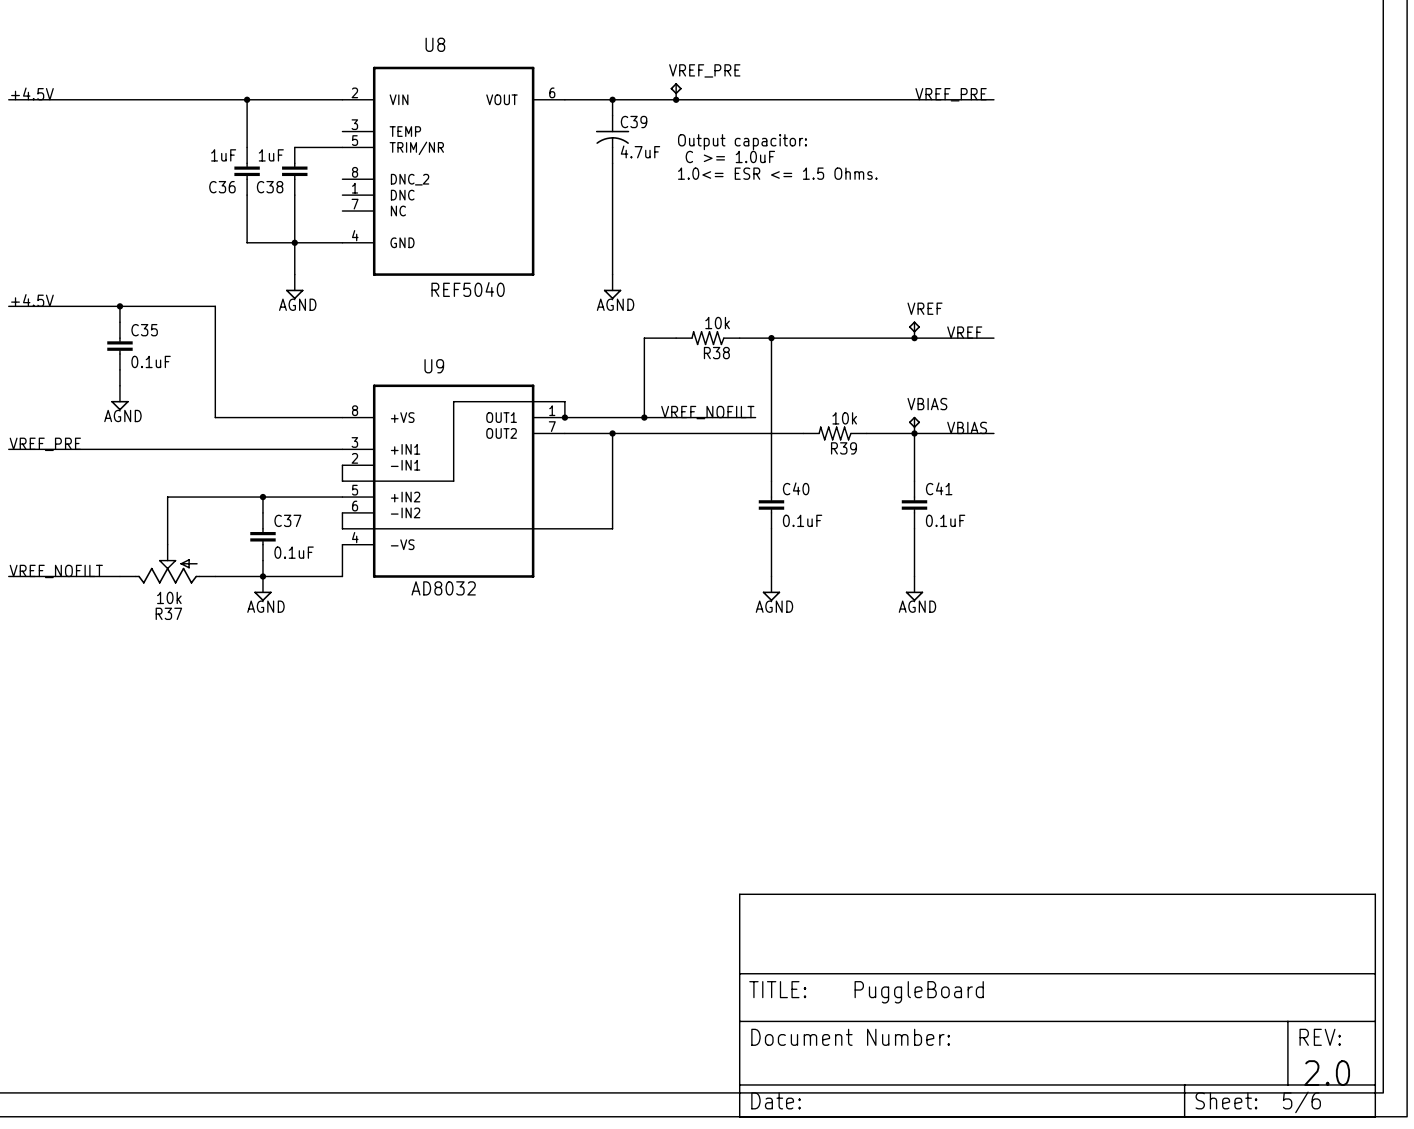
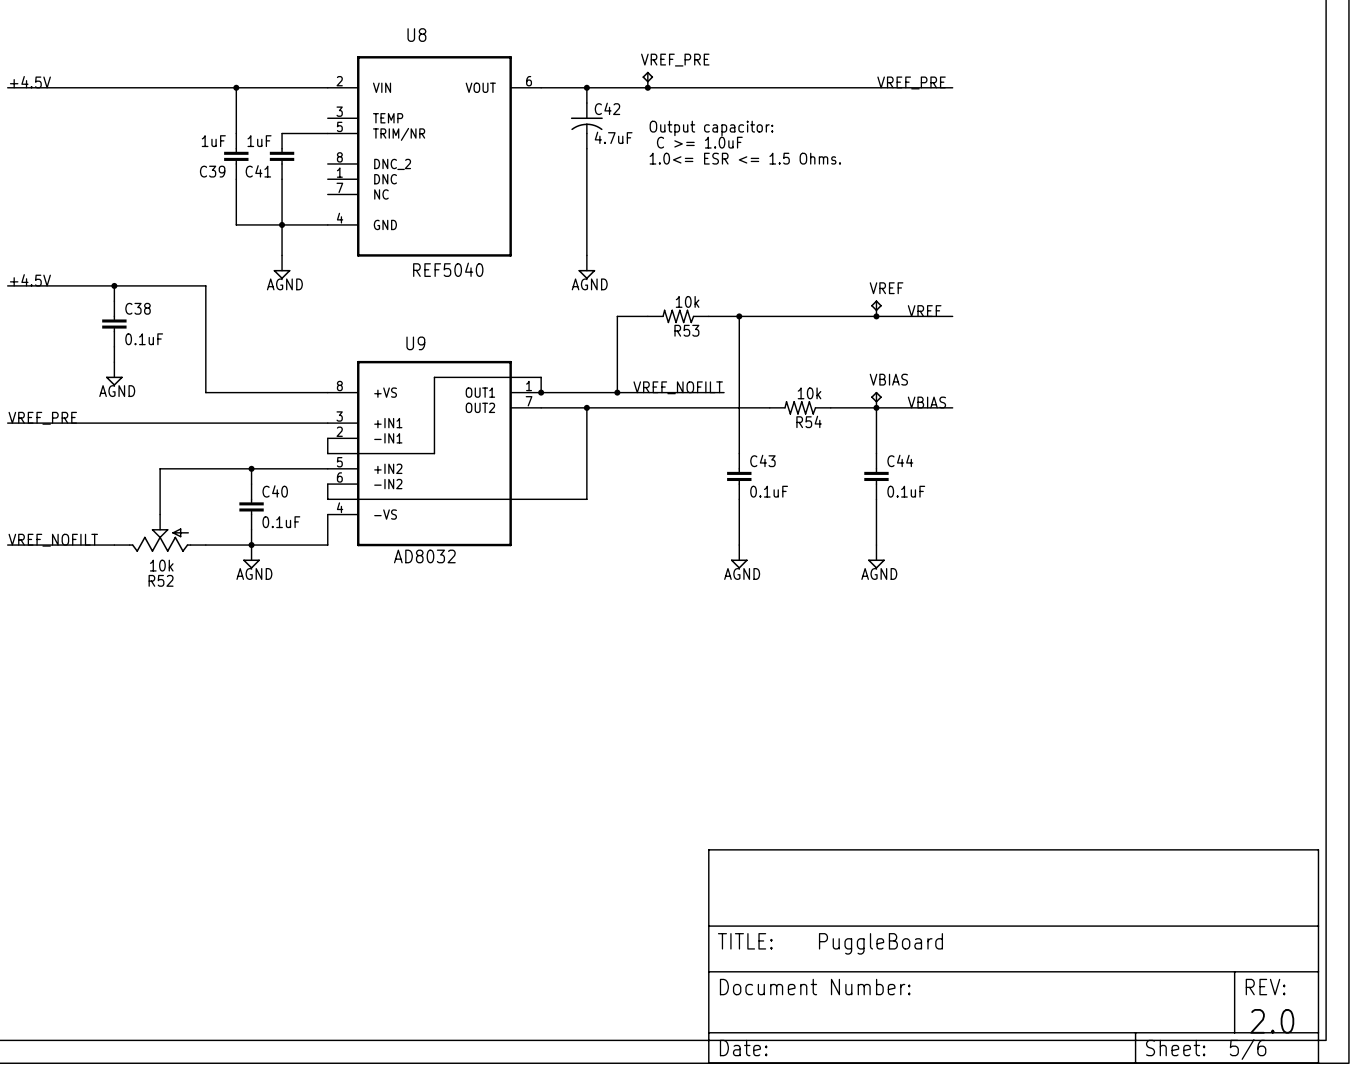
C39 name: C39 (634, 122) -> C42 (607, 108)
C36 name: C36 (222, 187) -> C39 (212, 171)
C38 name: C38 (270, 187) -> C41 (258, 171)
C35 name: C35 (144, 330) -> C38 (138, 308)
R38 name: R38 (716, 353) -> R53 (686, 330)
R39 name: R39 (843, 448) -> R54 (809, 421)
C40 name: C40 (796, 488) -> C43 (762, 460)
C41 name: C41 (939, 488) -> C44 (900, 460)
C37 name: C37 (287, 520) -> C40 (275, 491)
R37 name: R37 (168, 613) -> R52 (161, 580)

